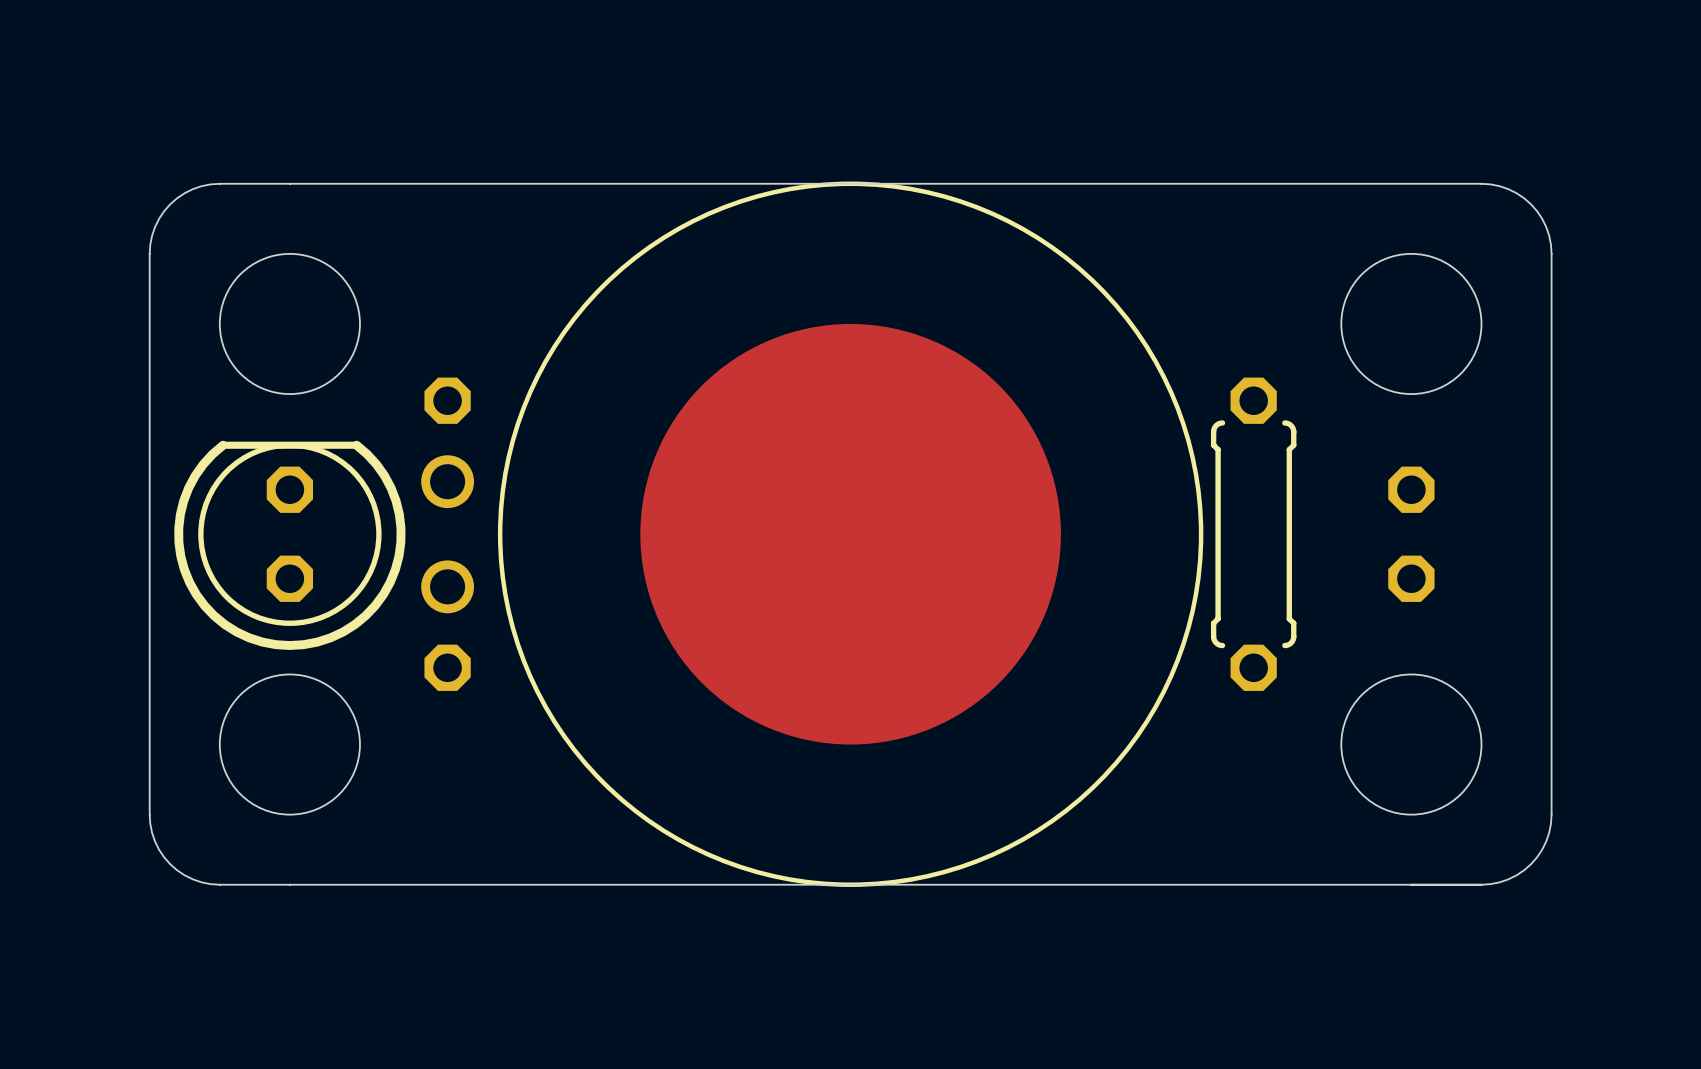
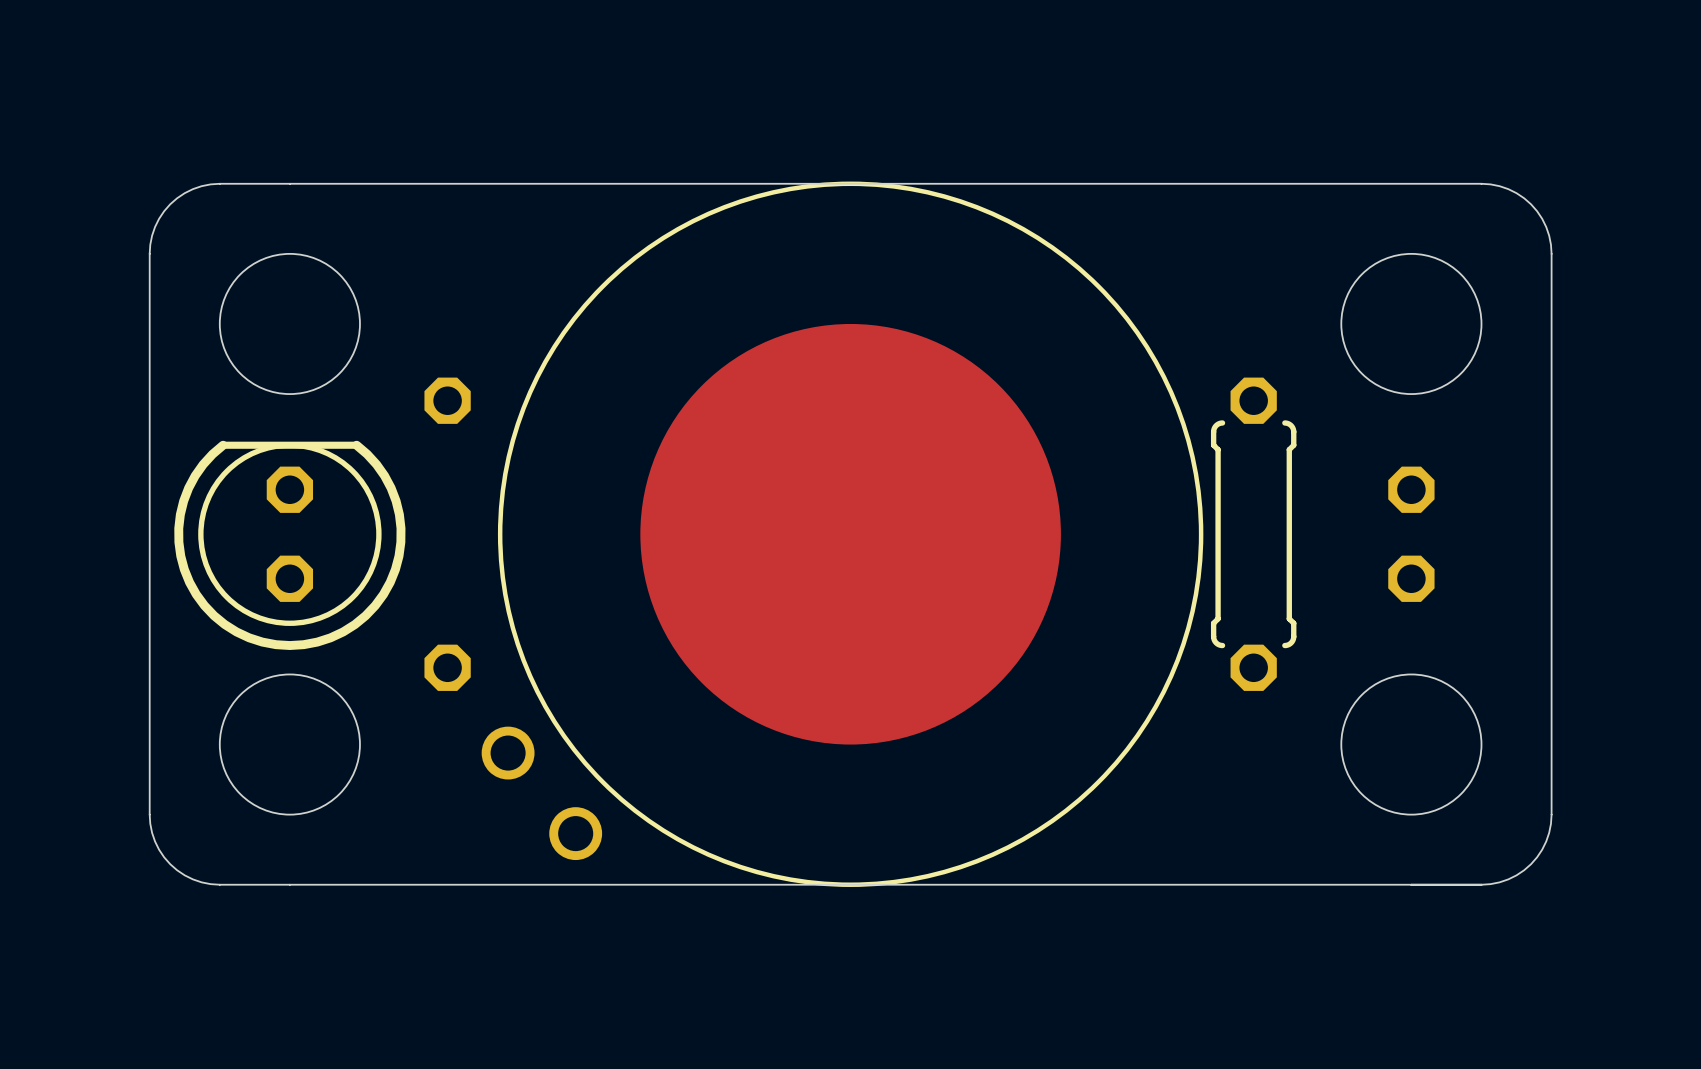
part rotation: 0° (812, 534) -> 40° counterclockwise (842, 534)

